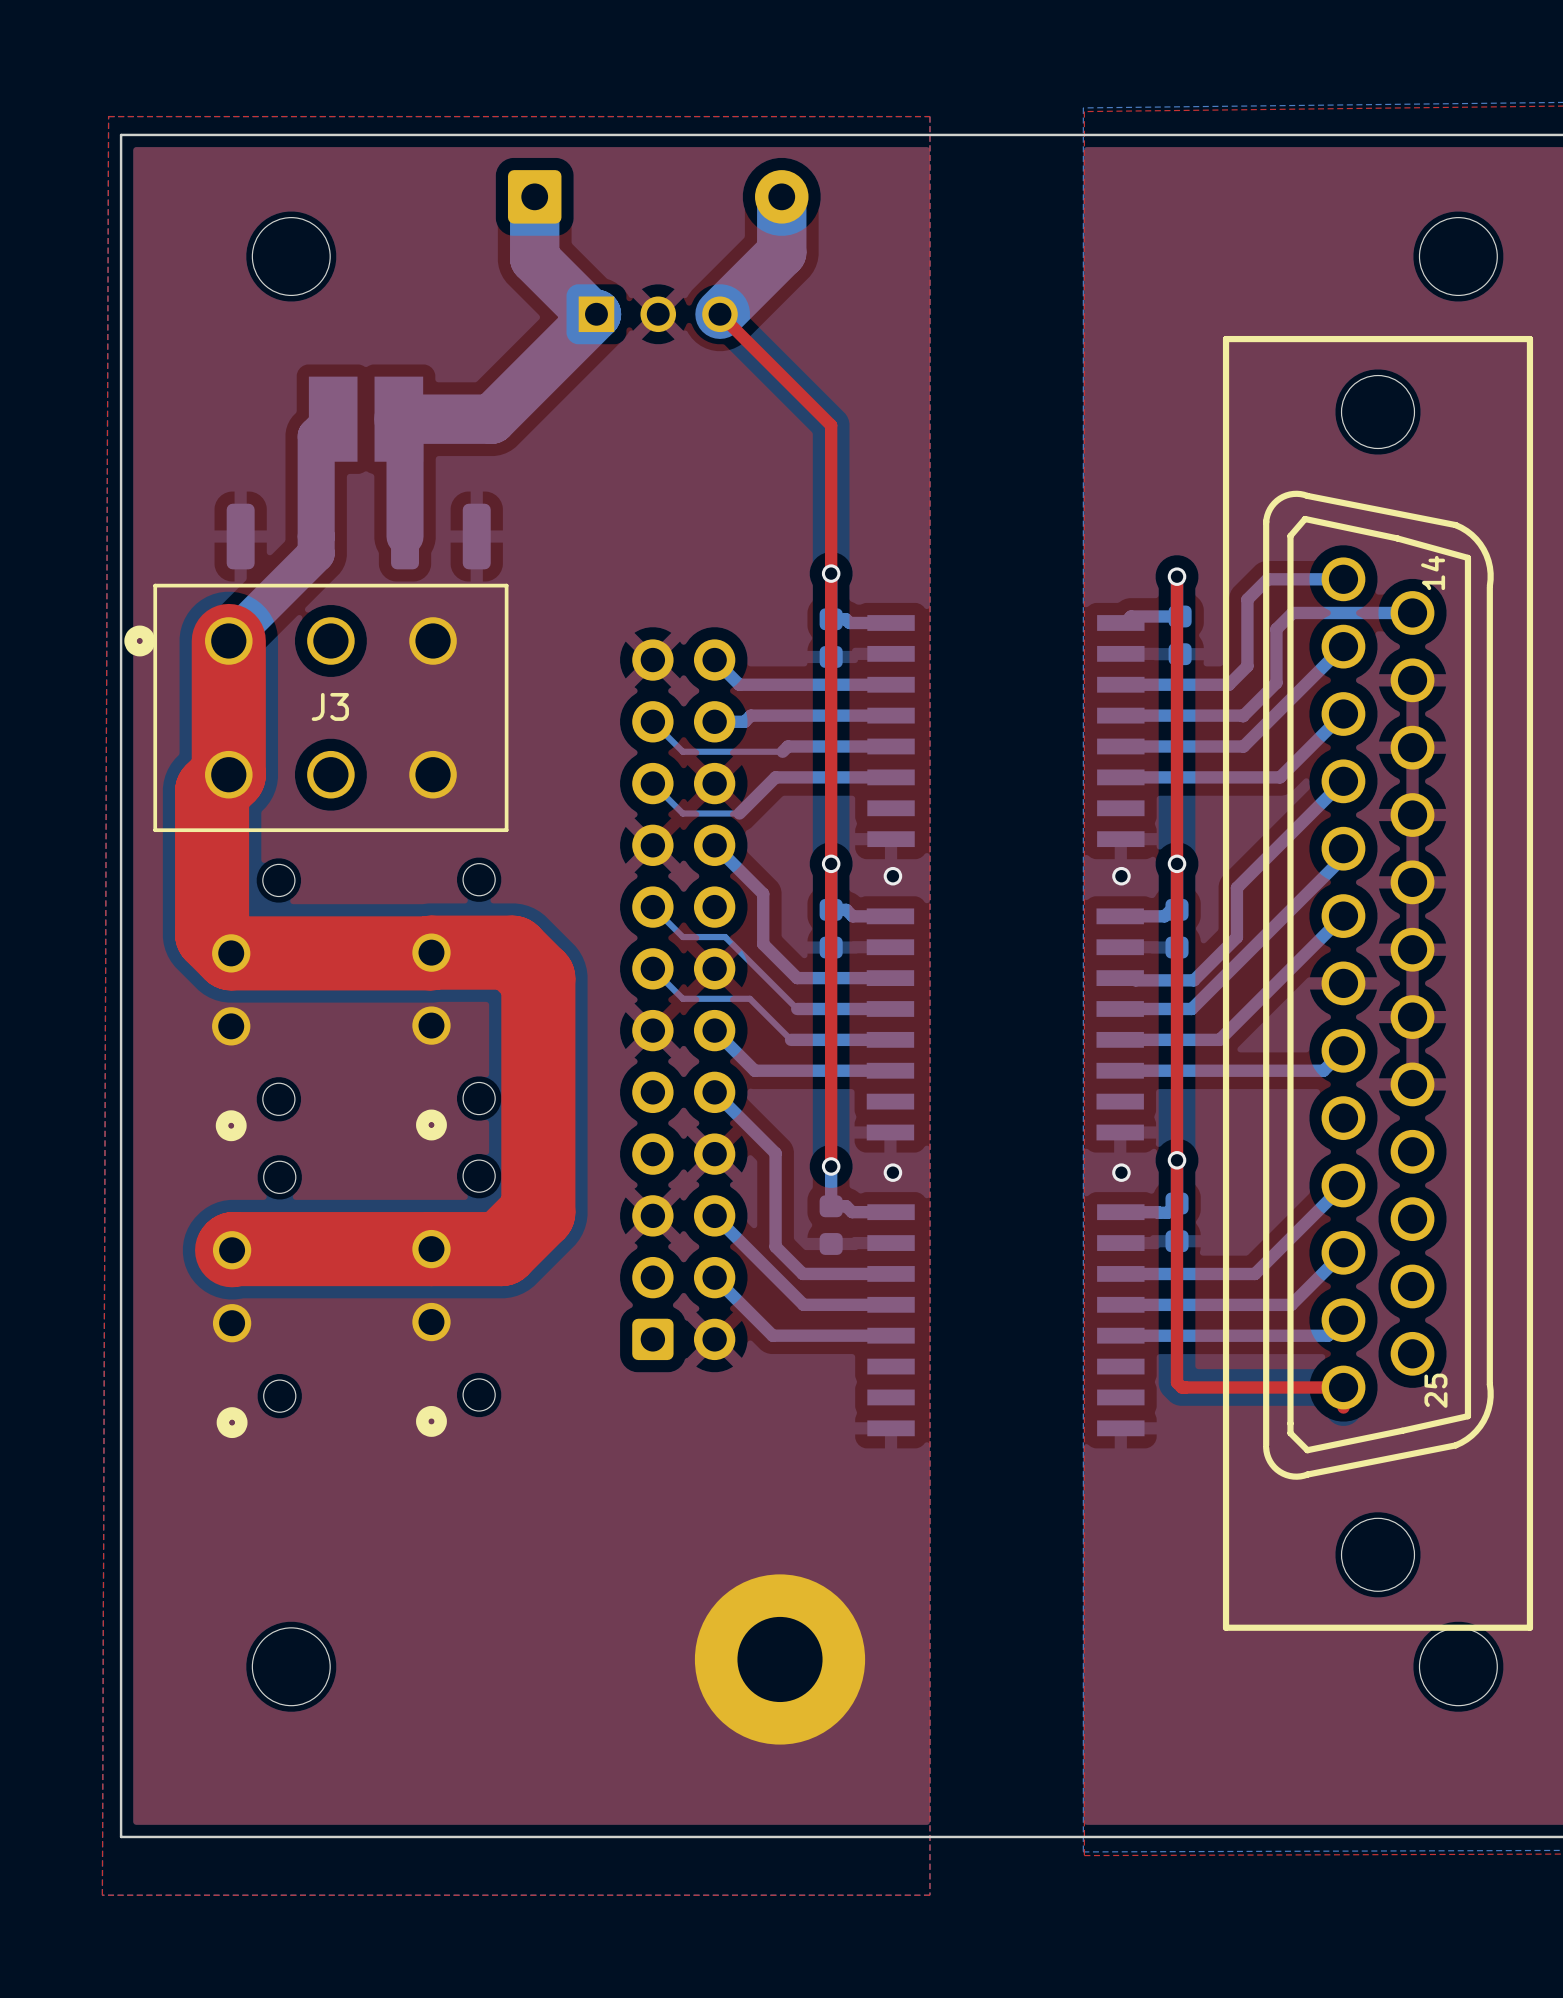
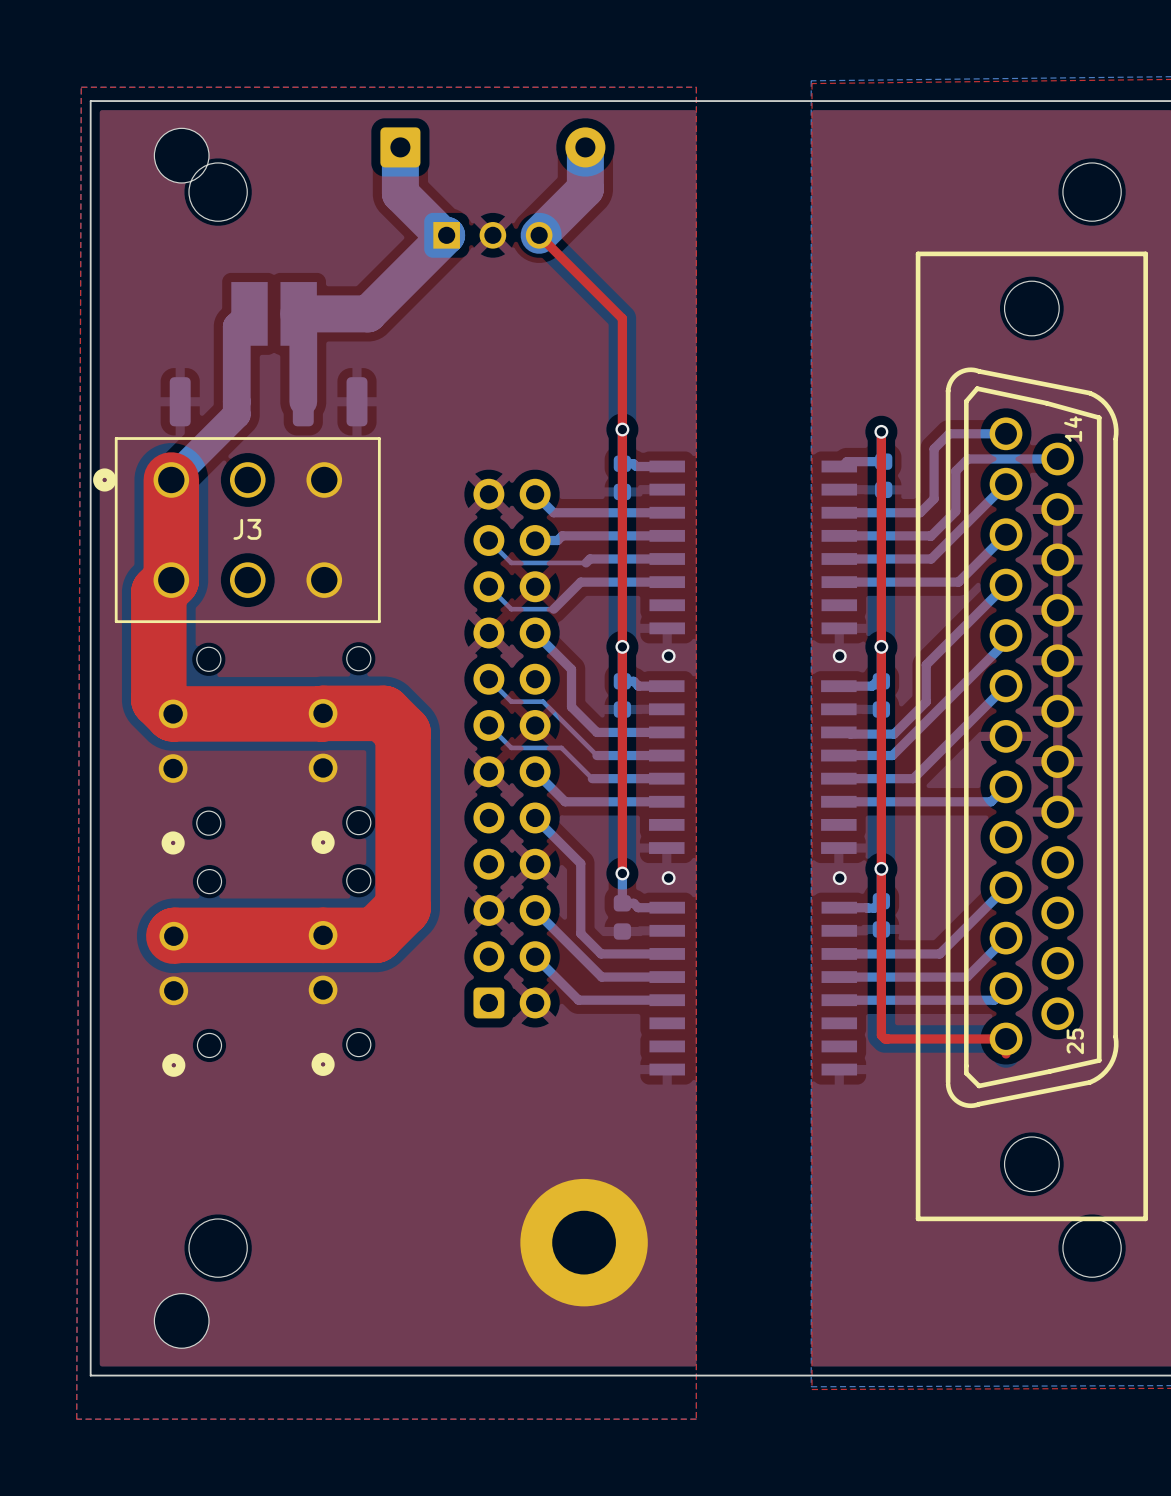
part: none -> (181, 155)
part: none -> (181, 1320)

